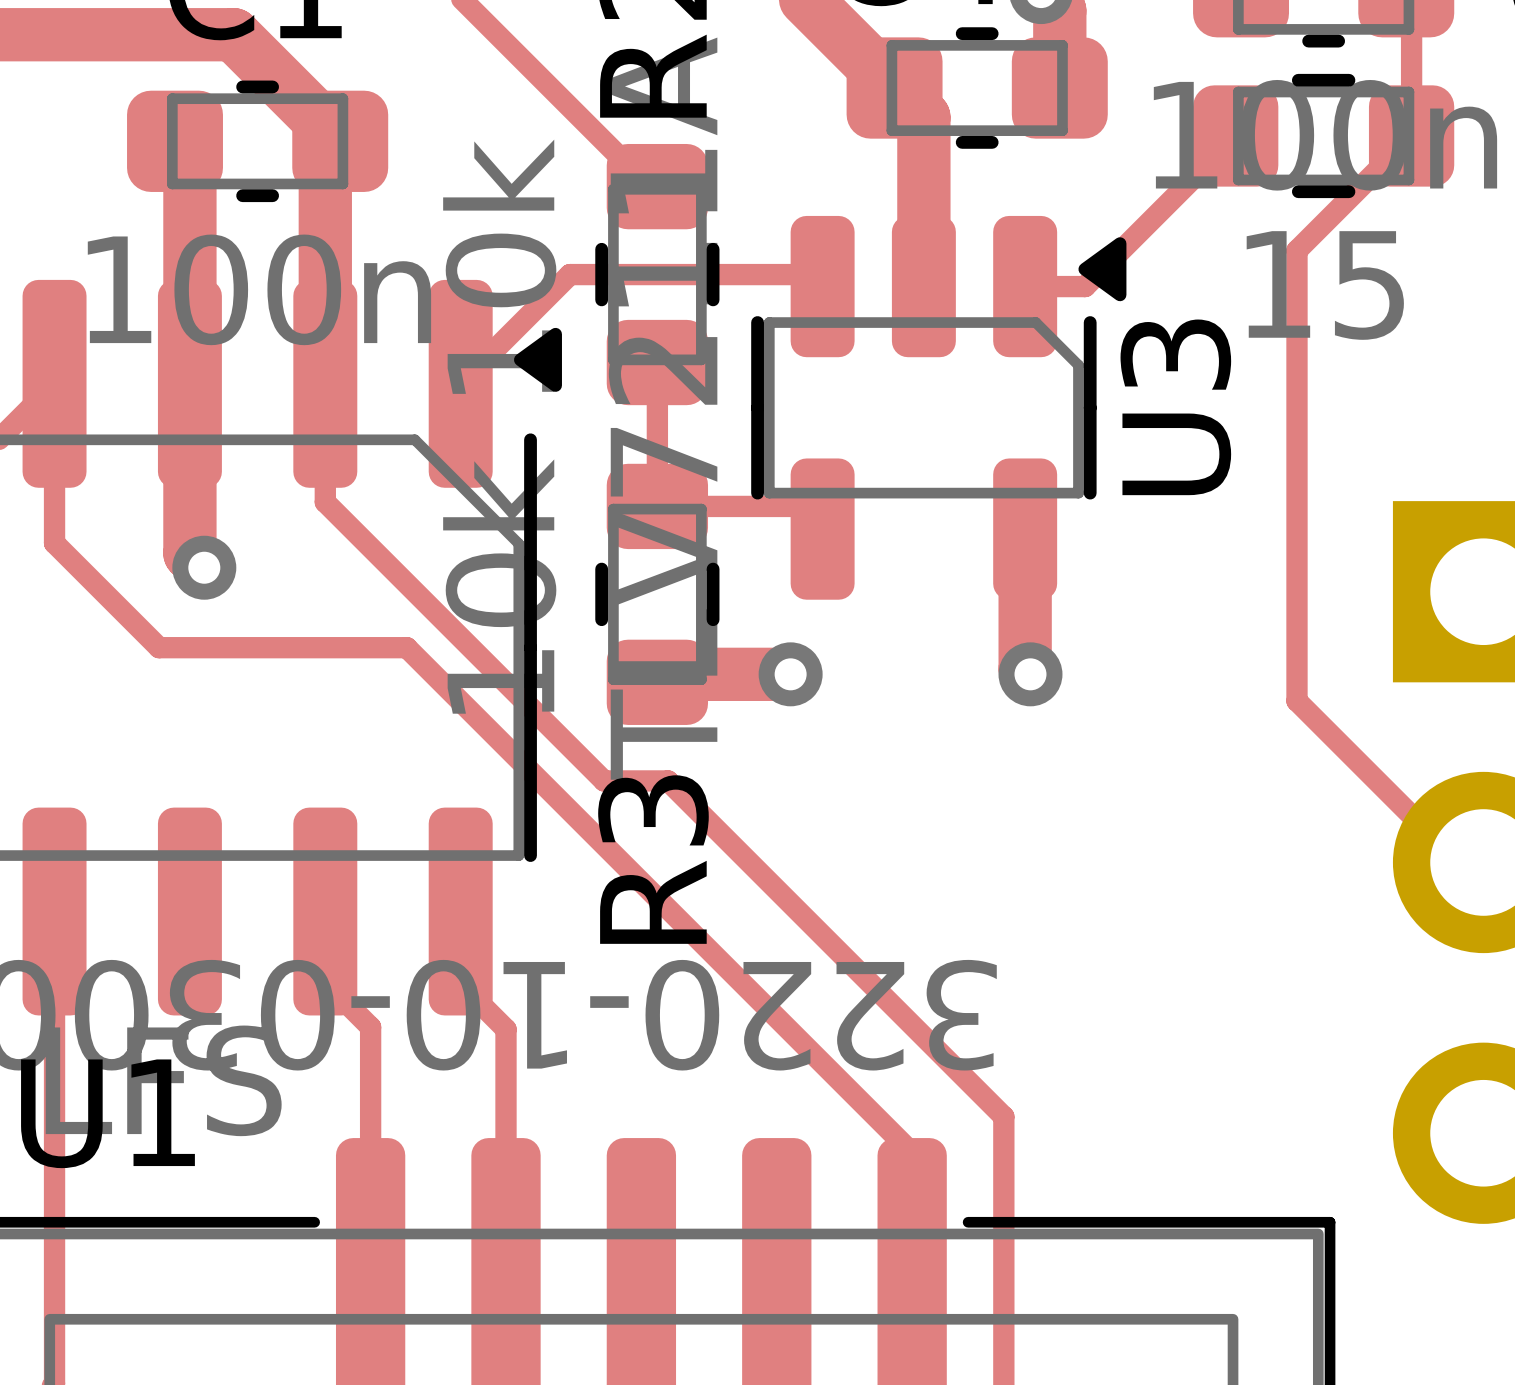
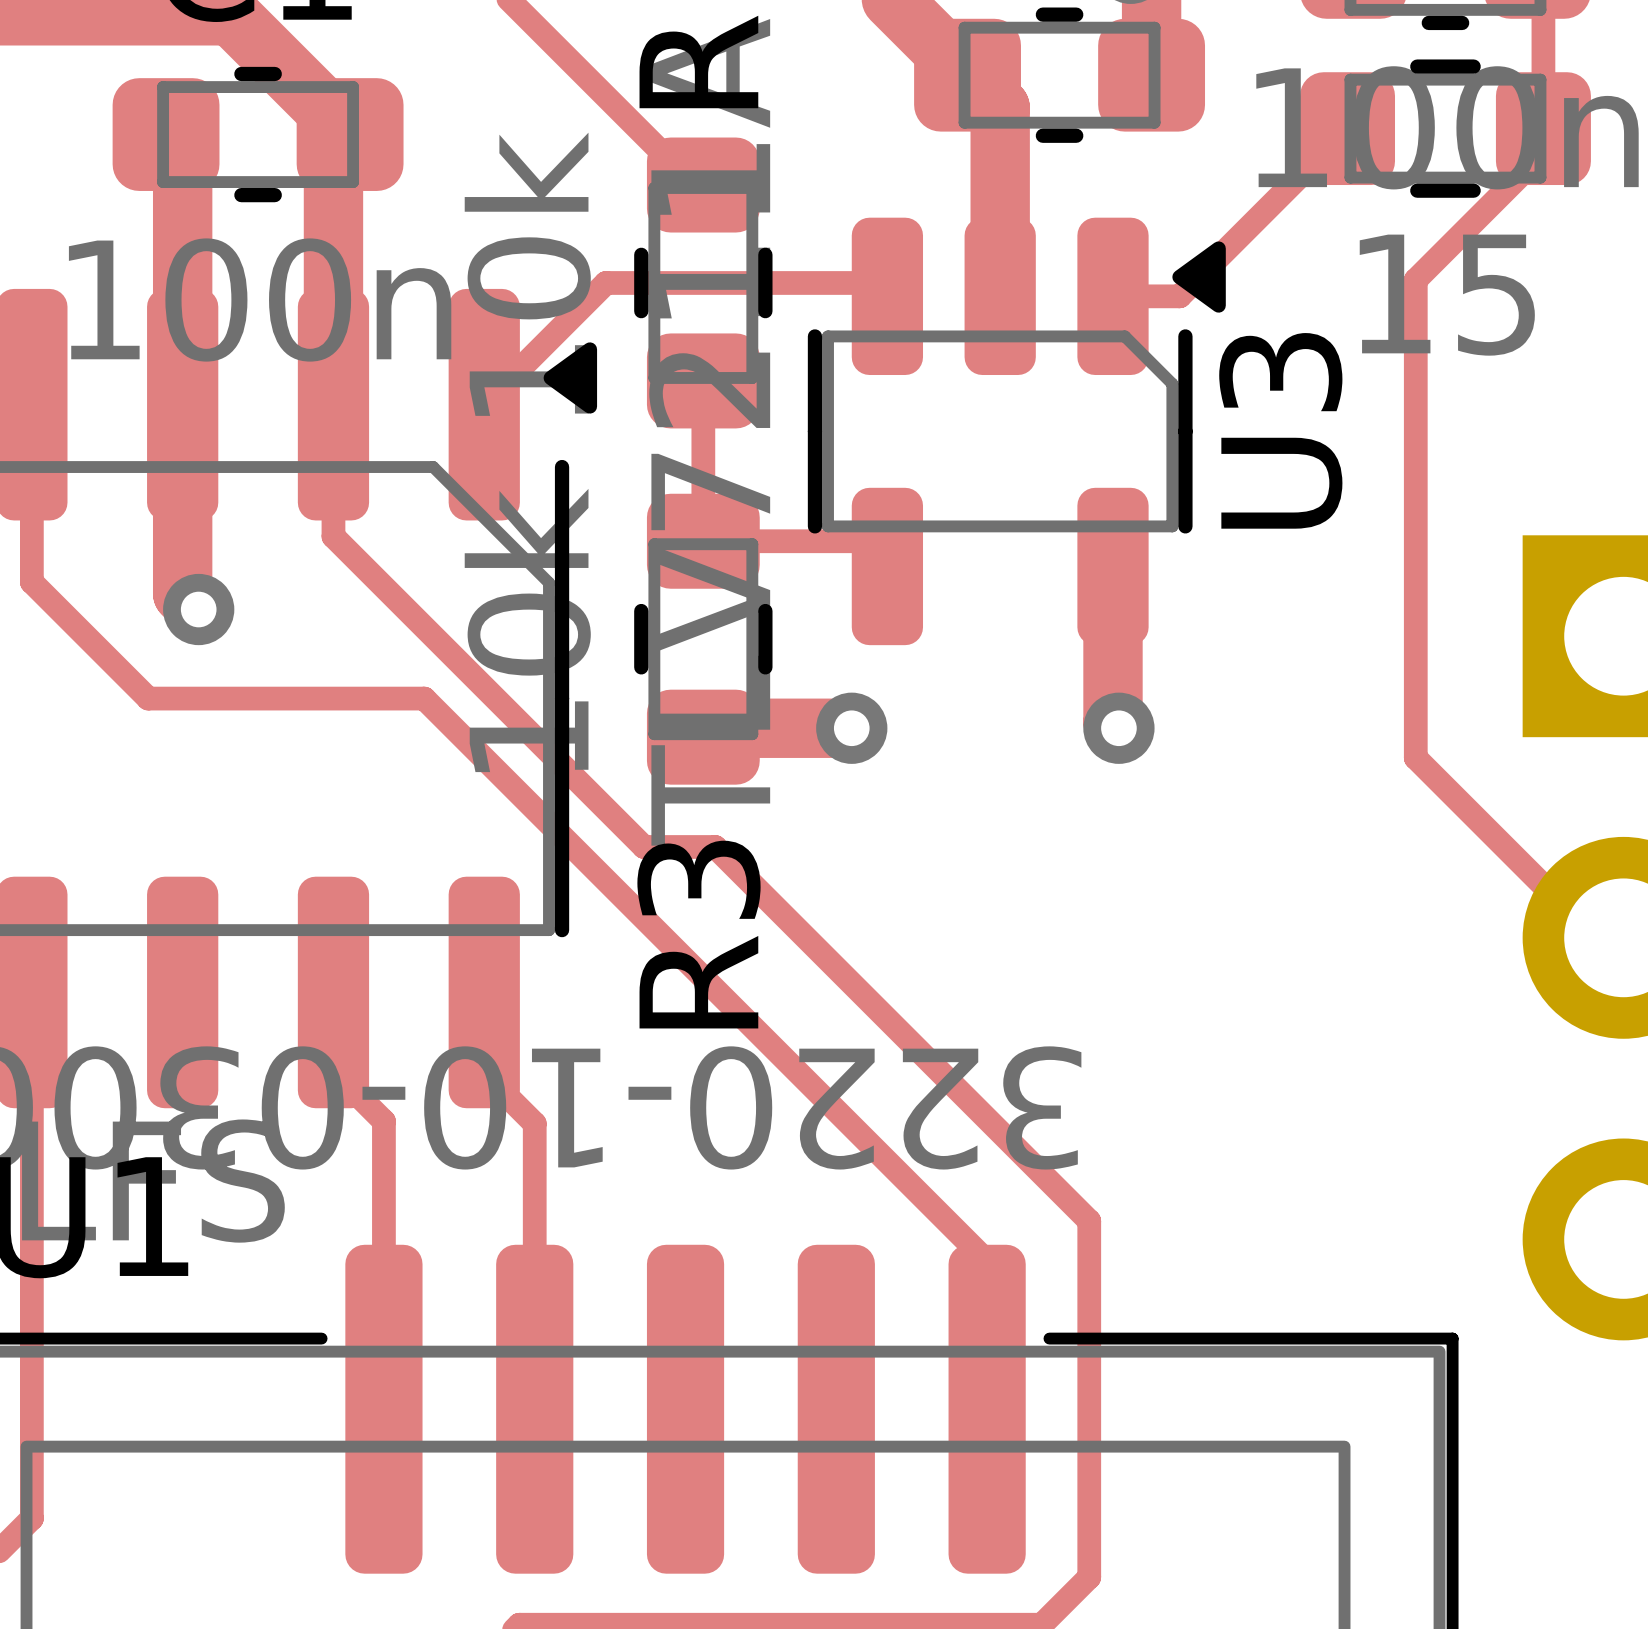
track: (1411, 135) (1296, 250) (1296, 271) -> (1543, 128) (1543, 152) (1415, 280)

